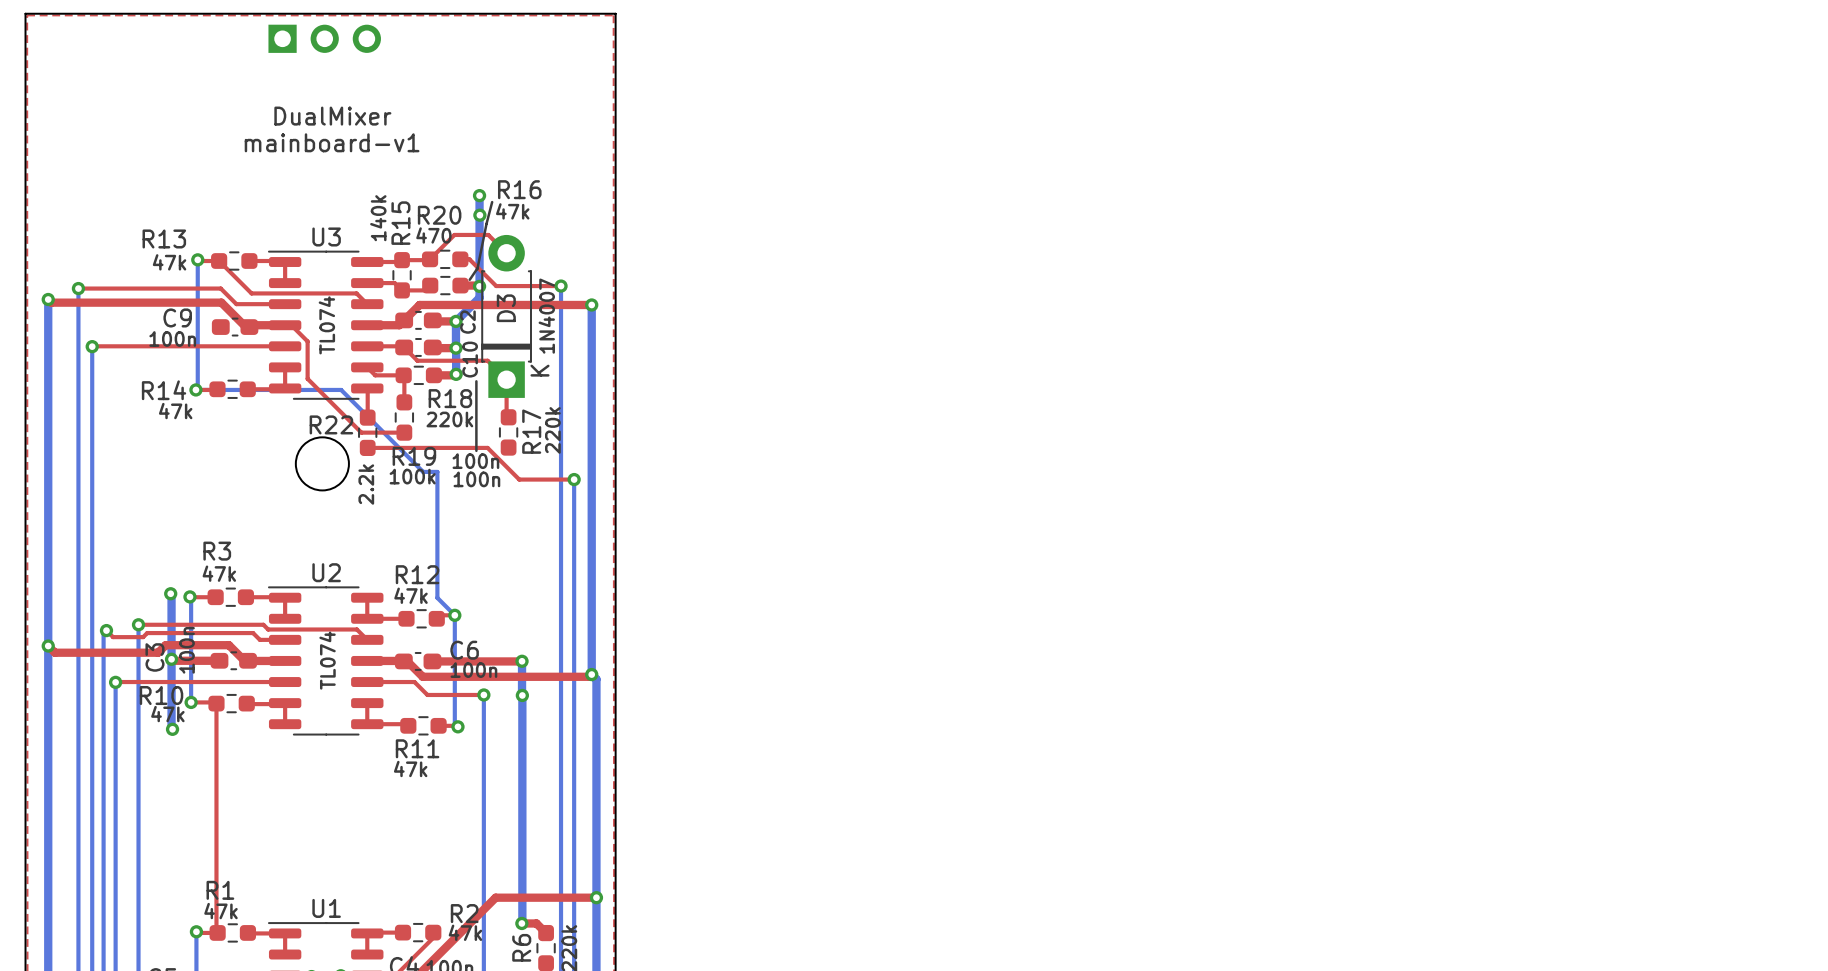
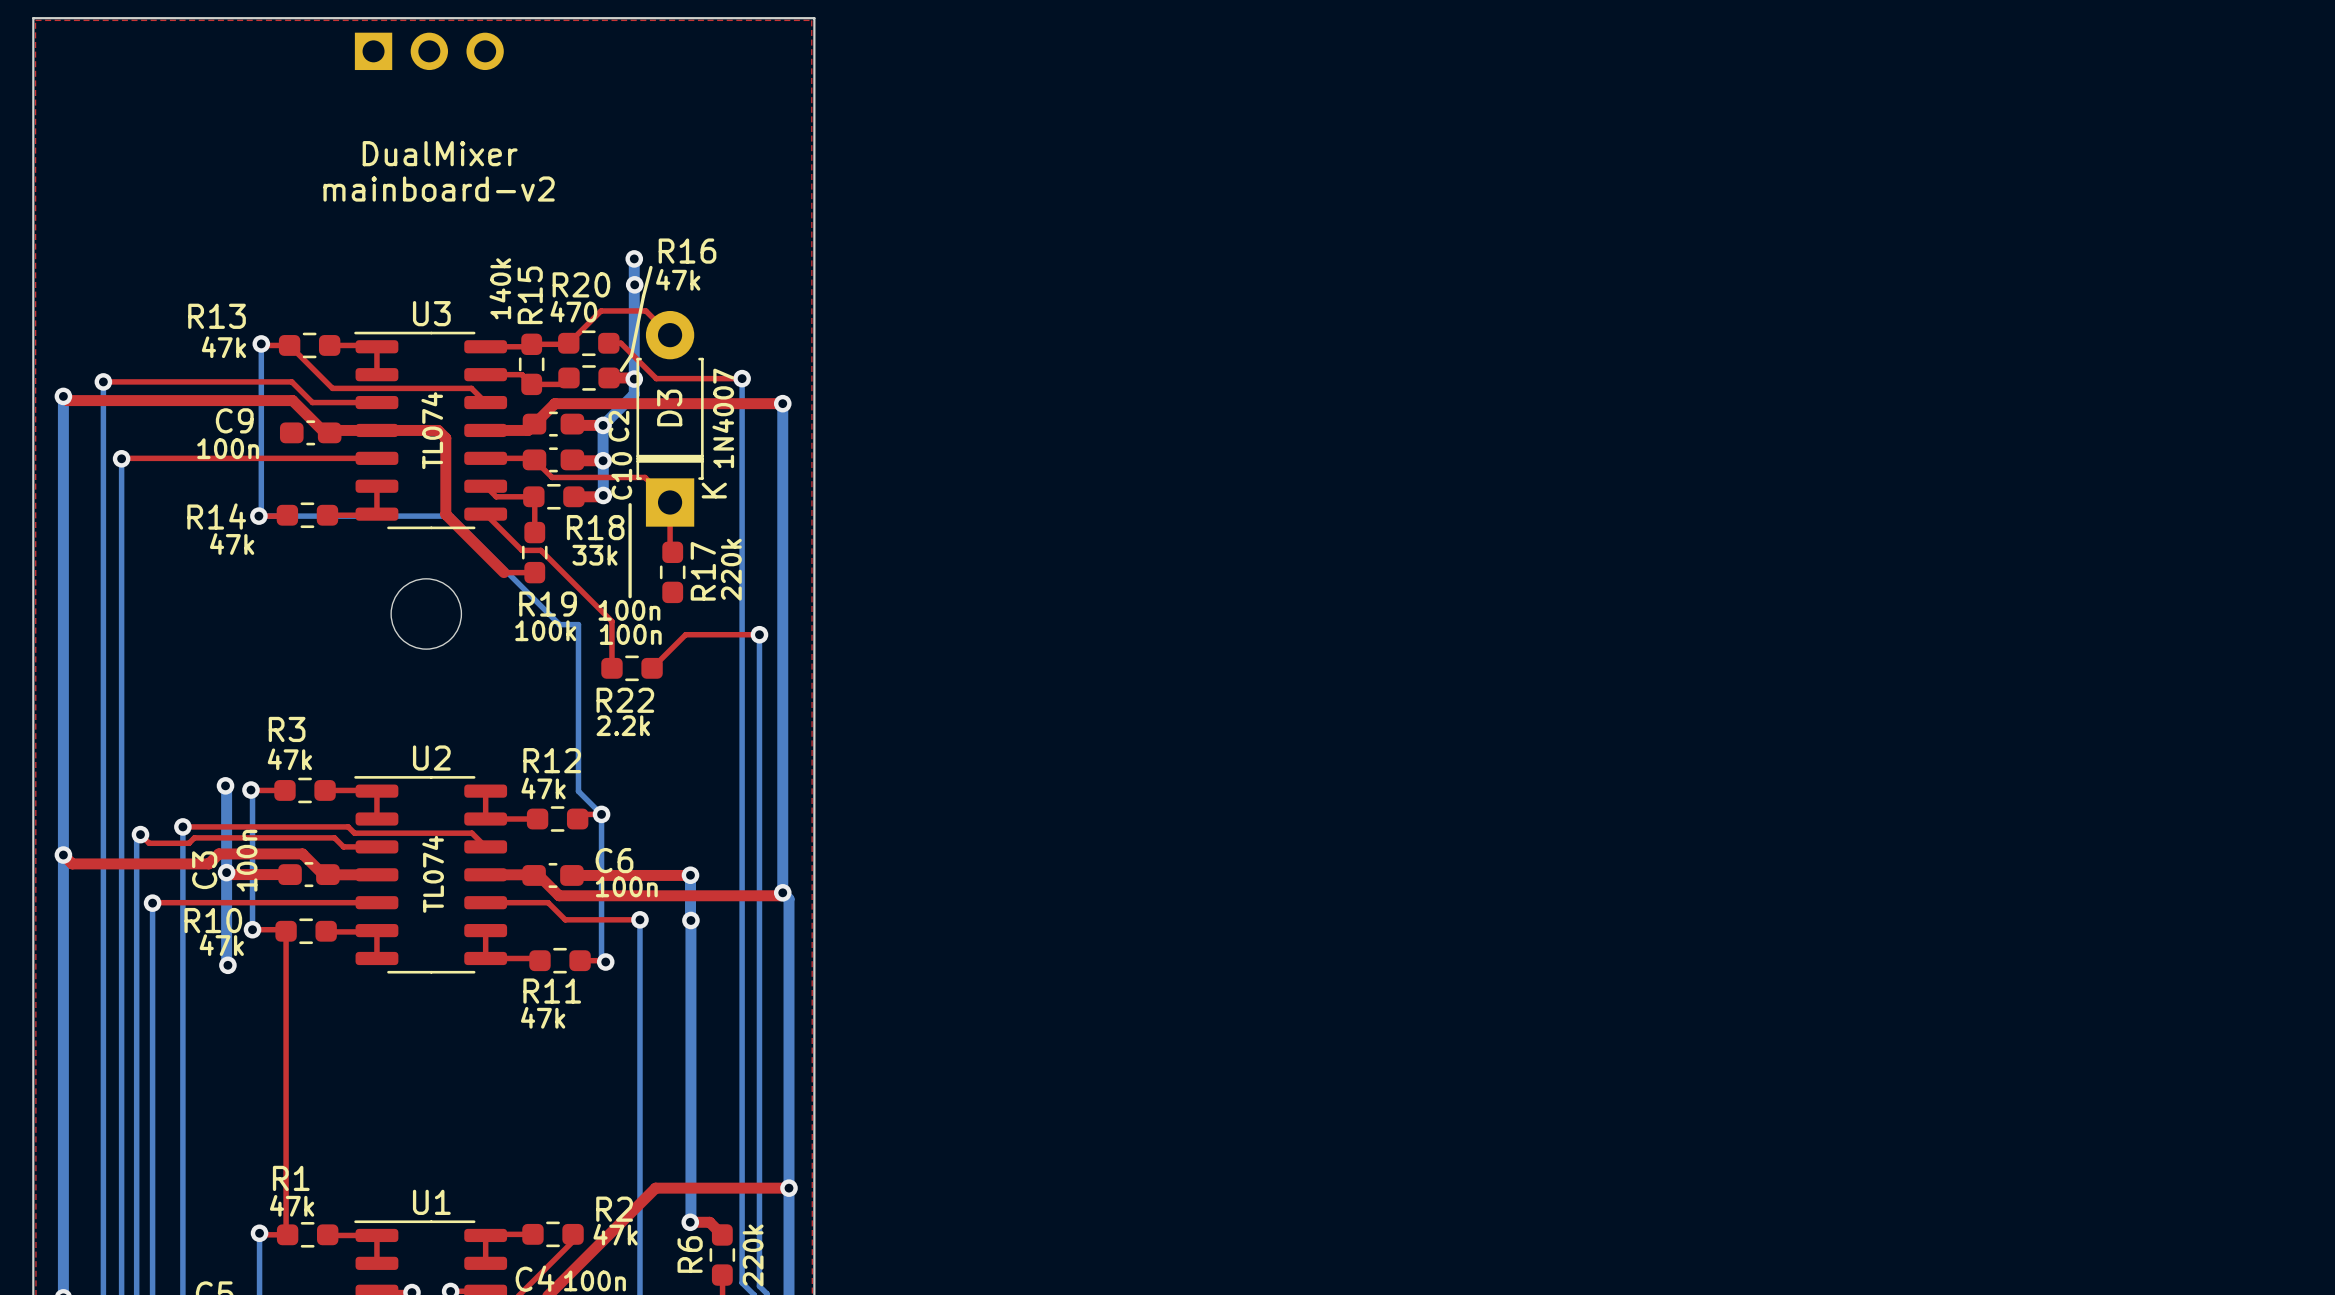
text: mainboard-v1 (332, 142) -> mainboard-v2 (439, 189)
top track: (291, 325) (307, 341) (307, 378) (361, 432) (381, 432) -> (376, 430) (438, 430) (445, 438) (445, 514) (504, 572)
top track: (367, 388) (367, 417) -> (486, 514) (521, 550) (540, 550) (611, 621) (611, 668)
R18 value: 220k (449, 419) -> 33k (594, 555)
R22 name position: R22 (331, 424) -> R22 (625, 700)
R22 rotation: 0° (367, 432) -> 90° clockwise (632, 668)
R22 position: (367, 432) -> (632, 668)
top track: (367, 447) (487, 447) (519, 479) -> (652, 668) (686, 634)

